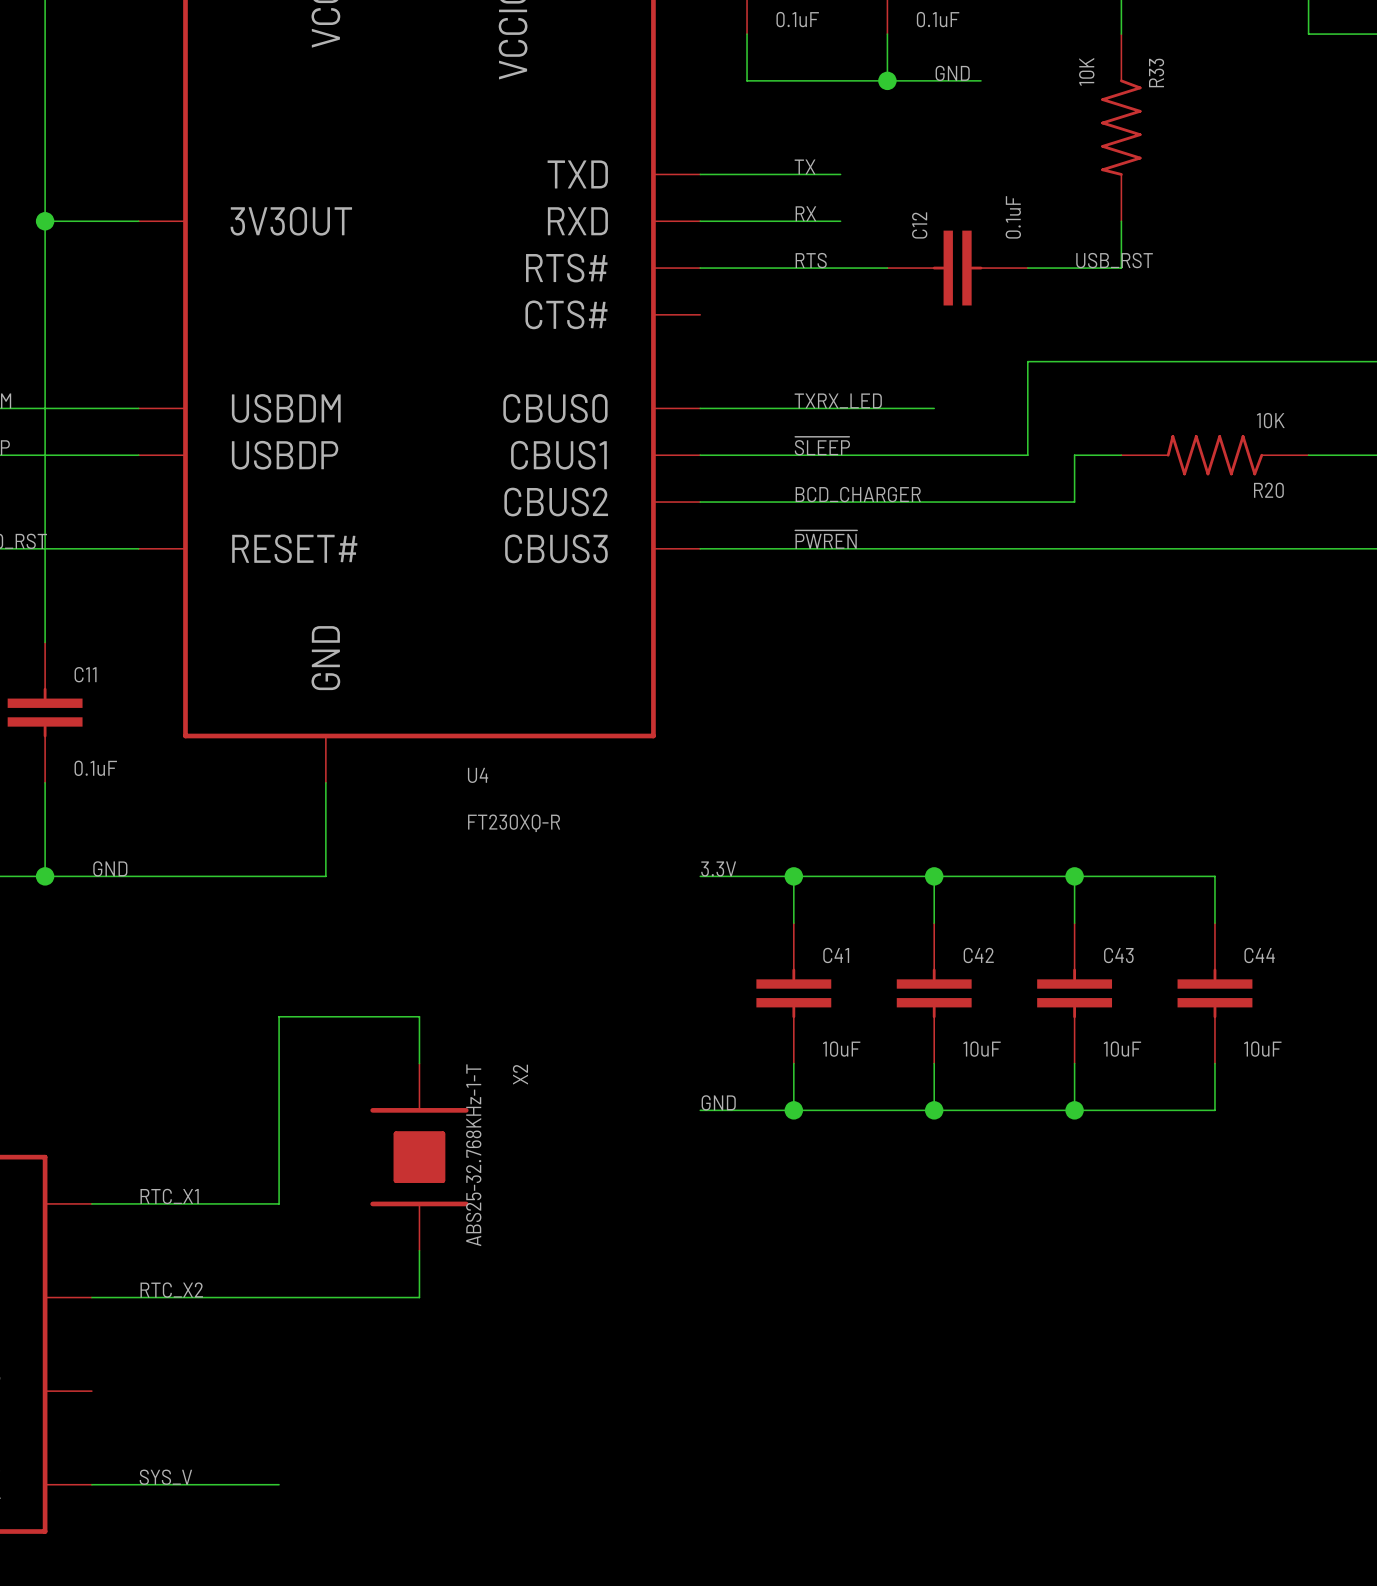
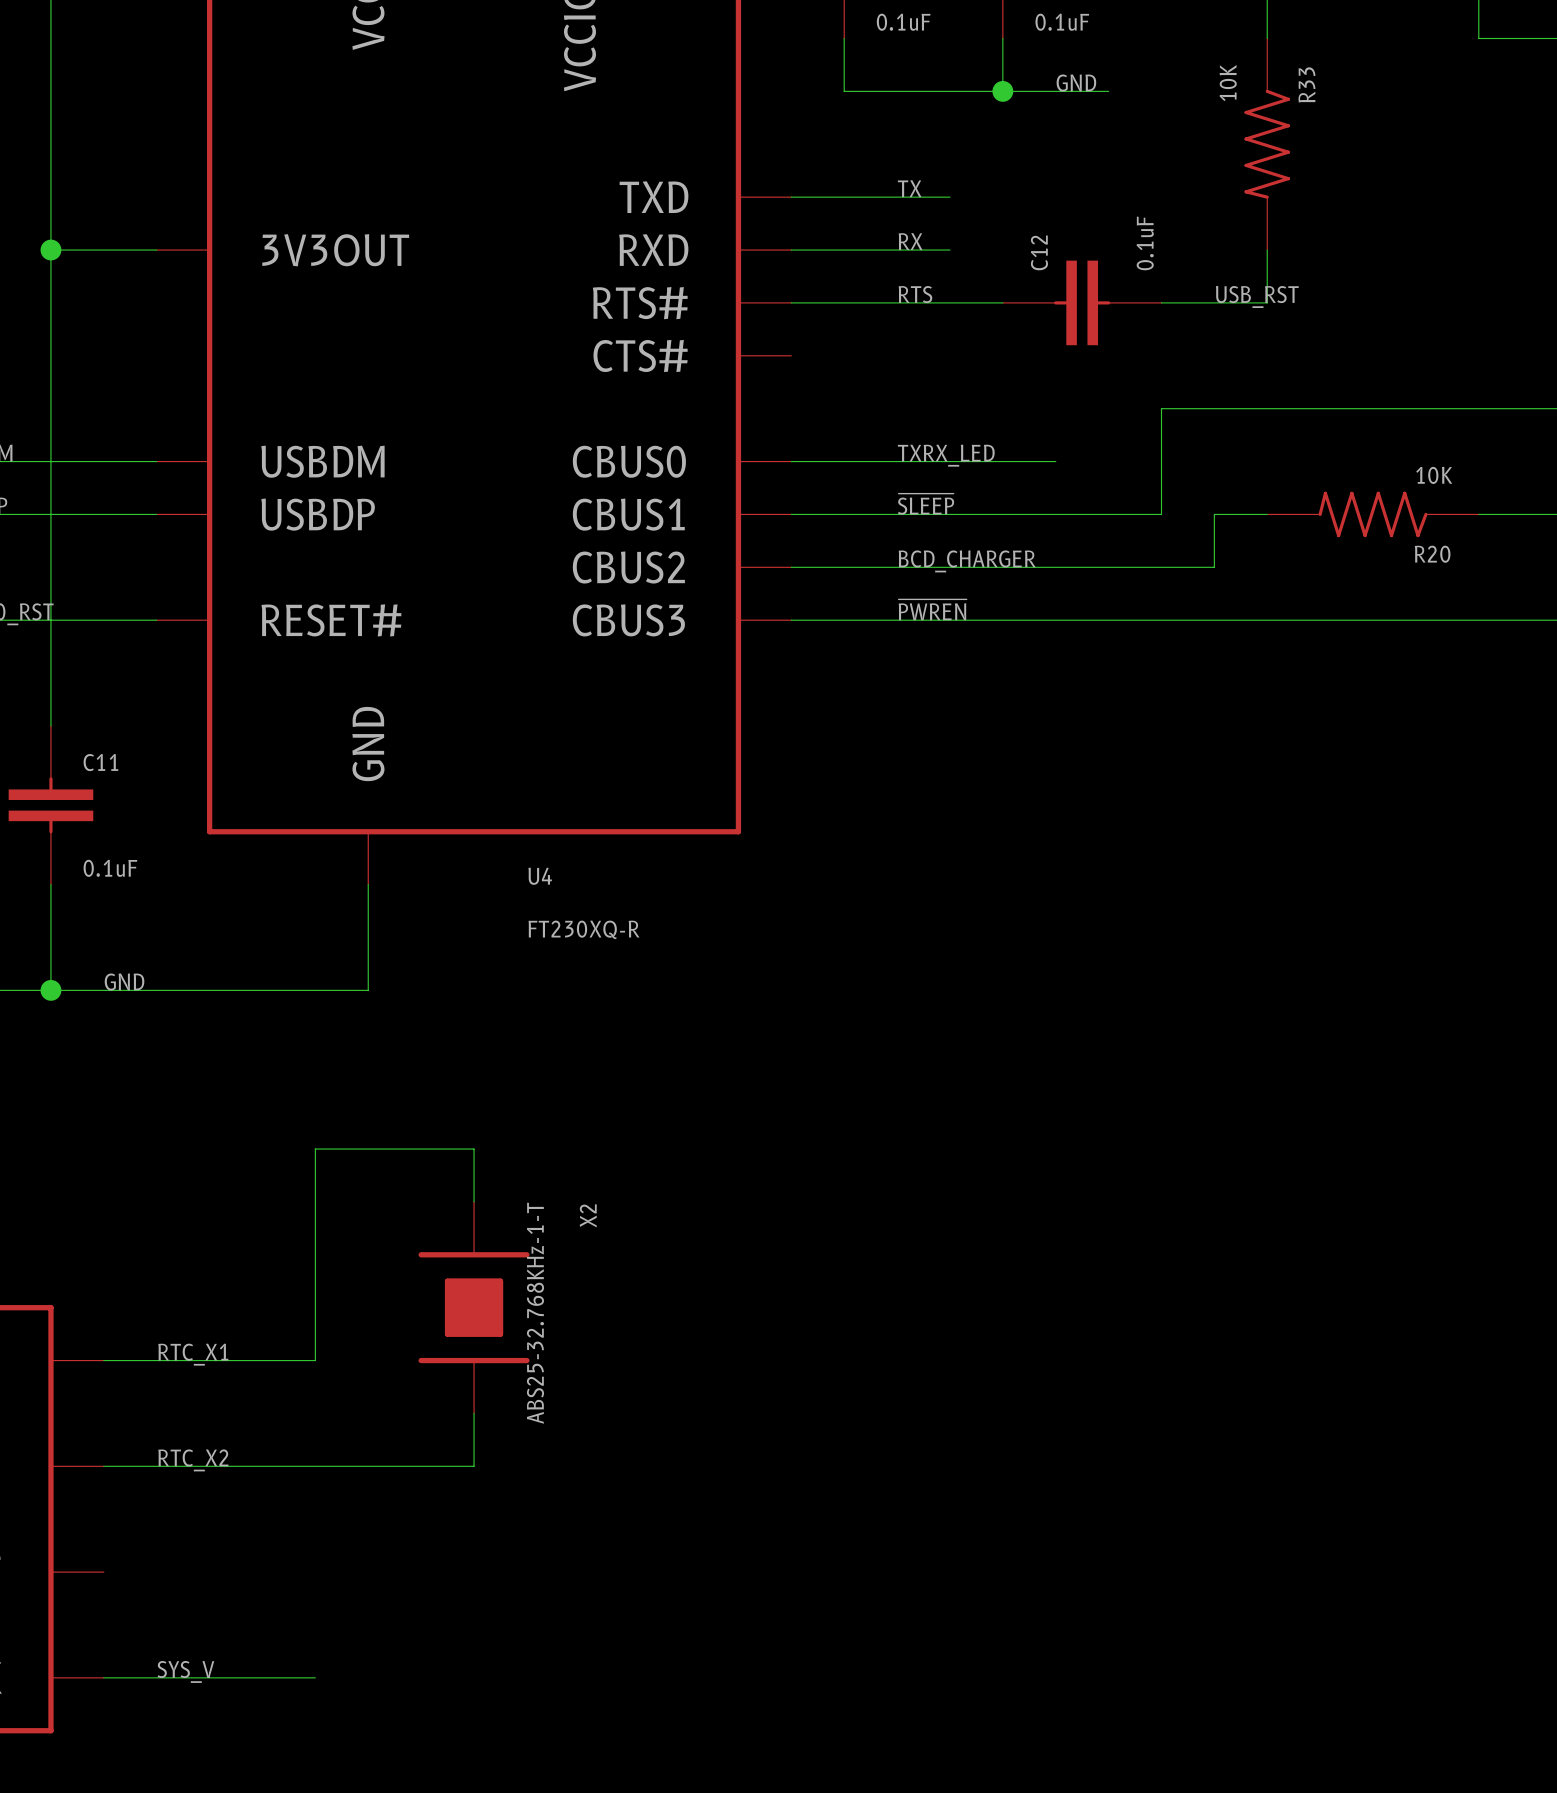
label: 3.3V (718, 868) -> none
wire: (700, 876) (1214, 876) (1214, 923) -> none
wire: (793, 876) (793, 923) -> none
junction: (793, 876) -> none
wire: (934, 876) (934, 923) -> none
junction: (934, 876) -> none
wire: (1074, 876) (1074, 923) -> none
junction: (1074, 876) -> none
C41: 10uF (793, 993) -> none
C42: 10uF (934, 993) -> none
C43: 10uF (1074, 993) -> none
C44: 10uF (1214, 993) -> none
wire: (793, 1063) (793, 1110) -> none
wire: (934, 1063) (934, 1110) -> none
wire: (1074, 1063) (1074, 1110) -> none
wire: (1214, 1063) (1214, 1110) (700, 1110) -> none
label: GND (718, 1102) -> none
junction: (793, 1110) -> none
junction: (934, 1110) -> none
junction: (1074, 1110) -> none

